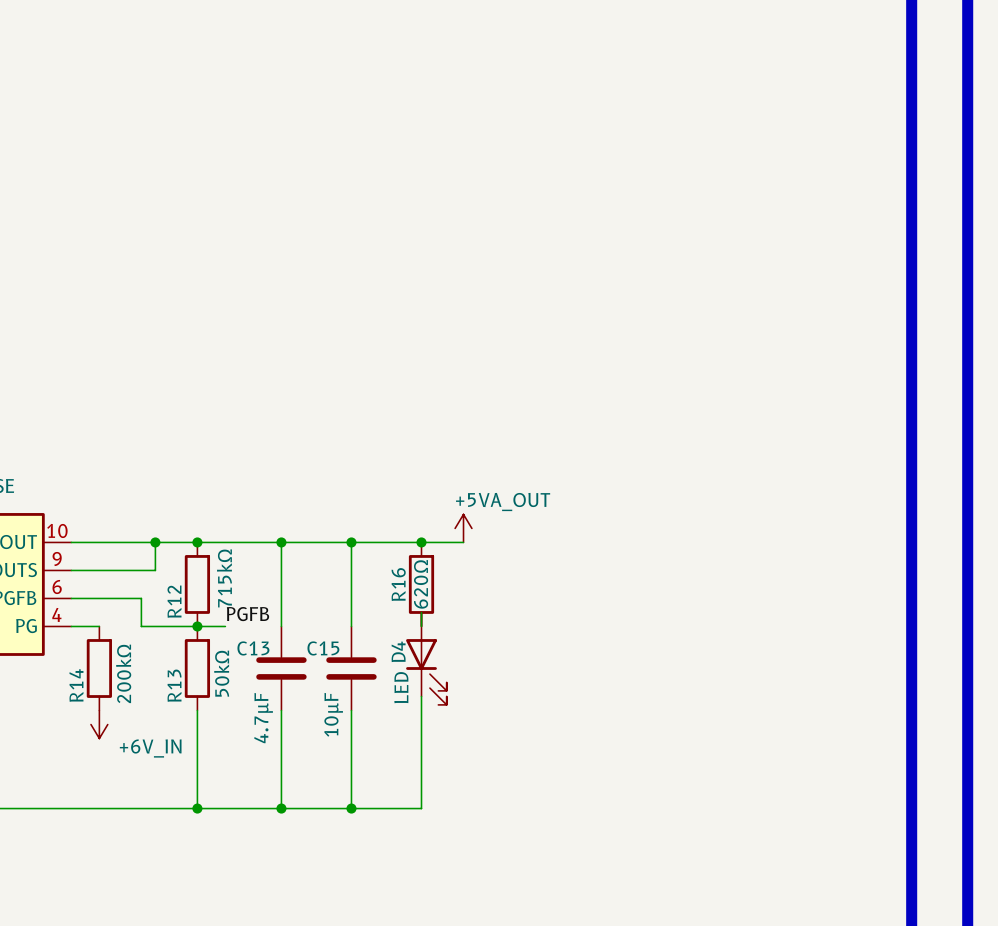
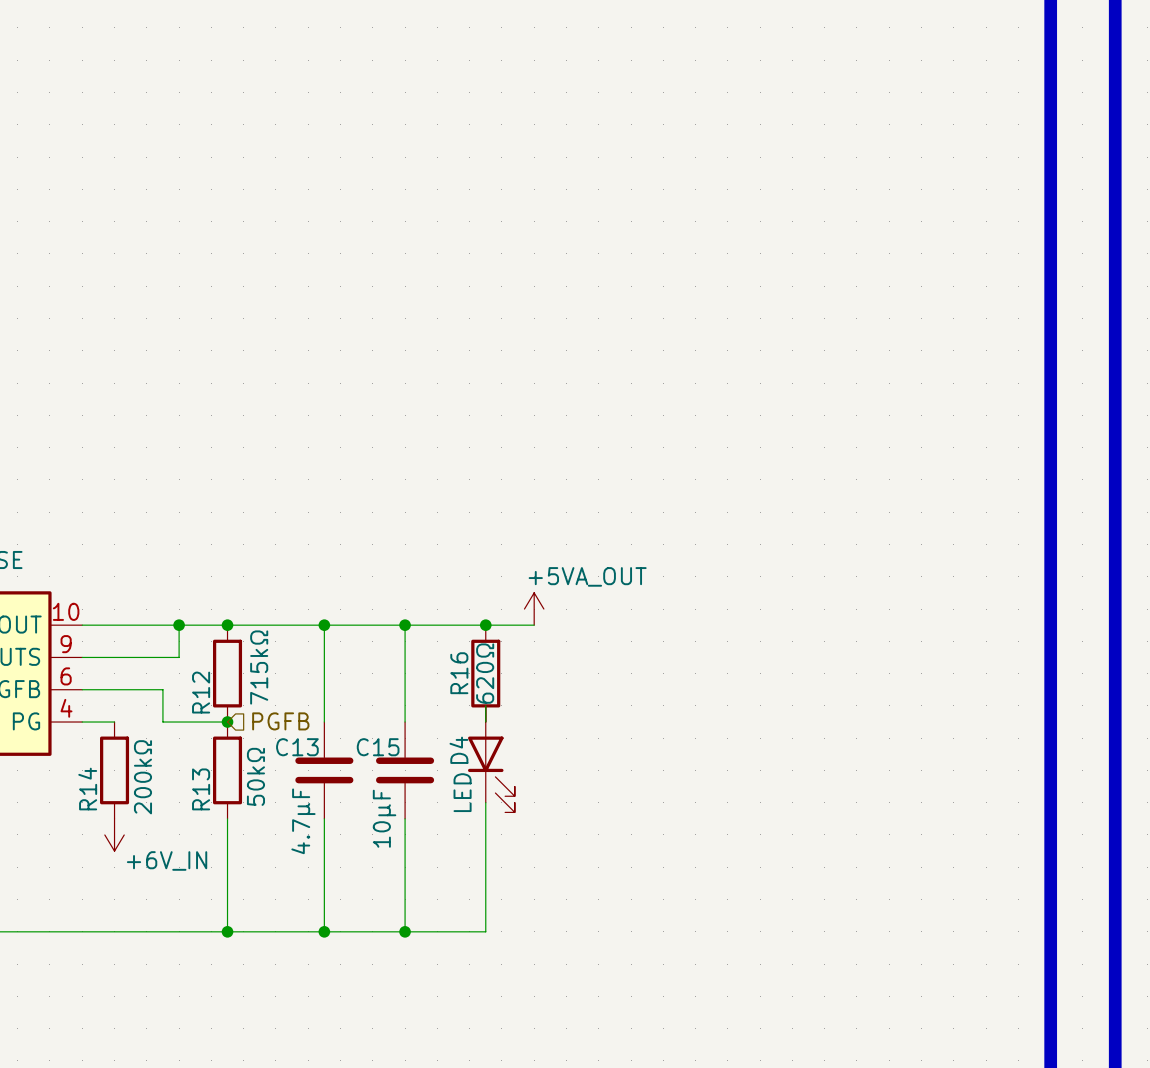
label: PGFB (247, 614) -> none
wire: (197, 626) (225, 626) -> none
hierarchical label: none -> PGFB (280, 721)

